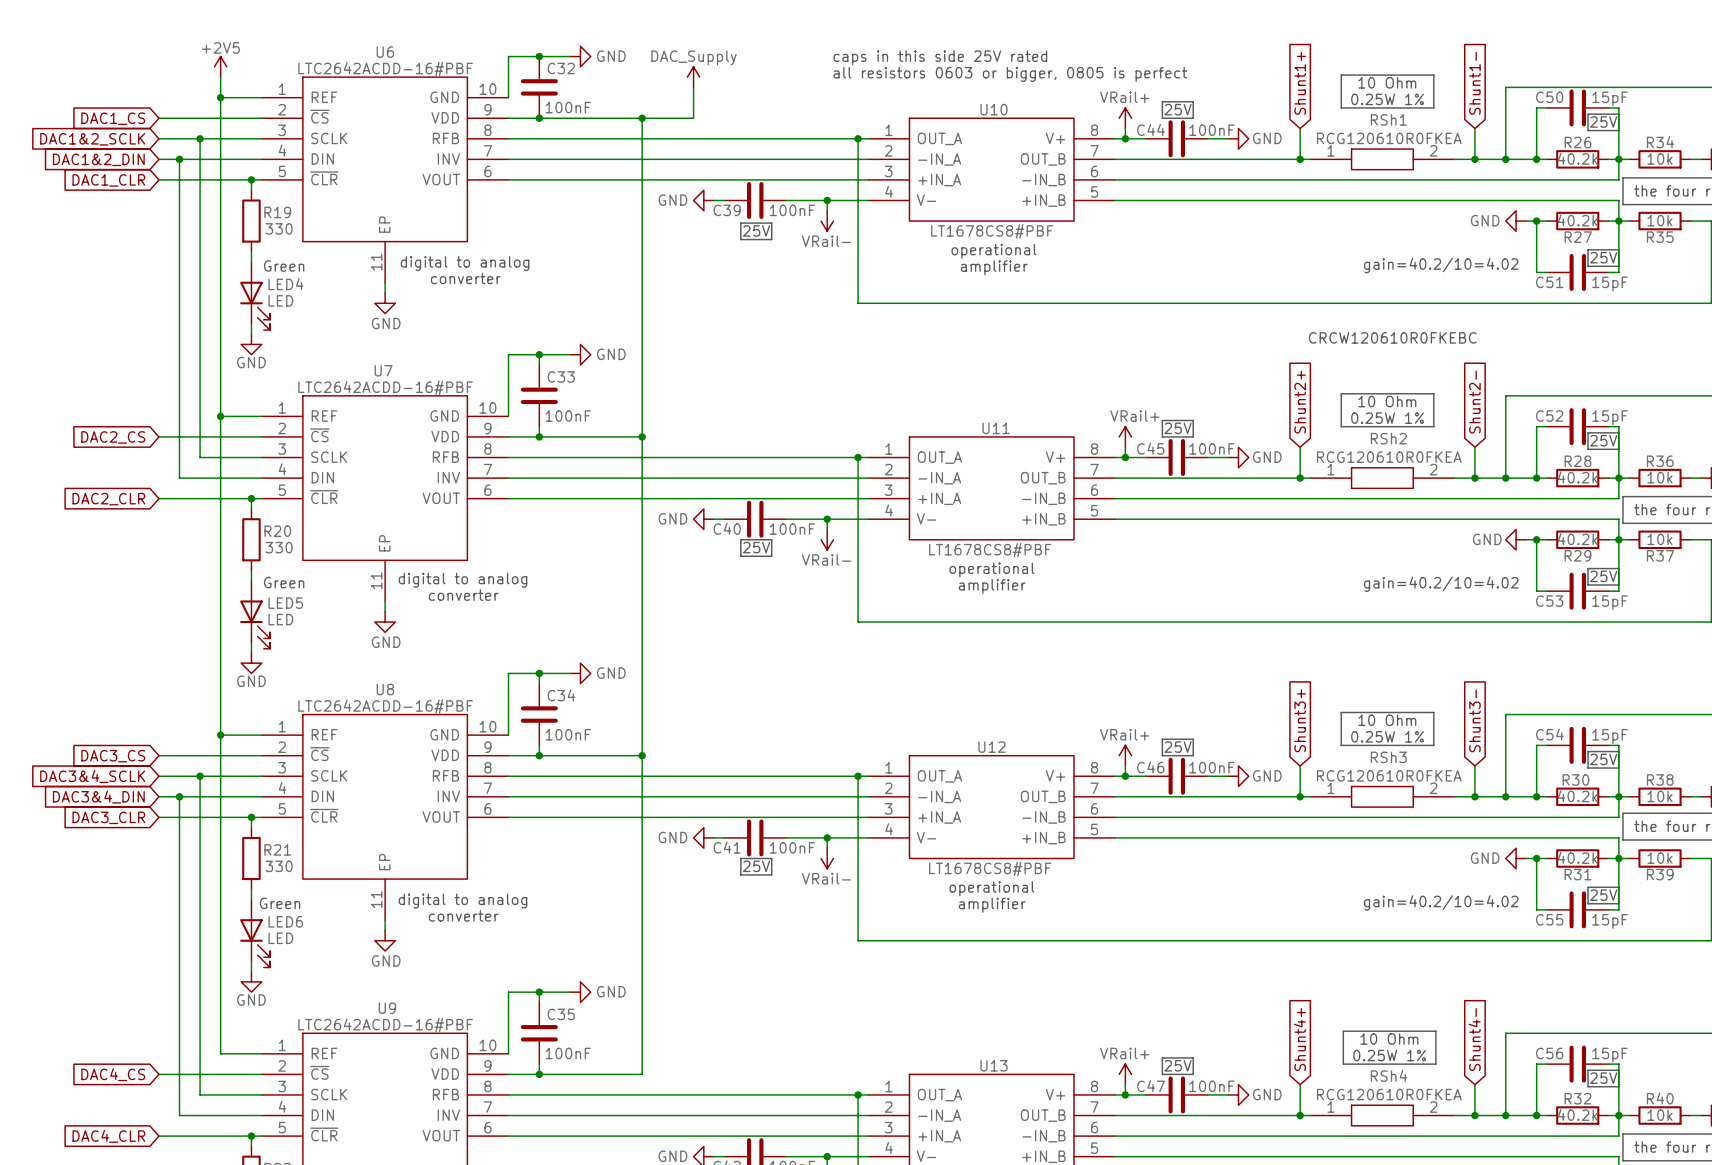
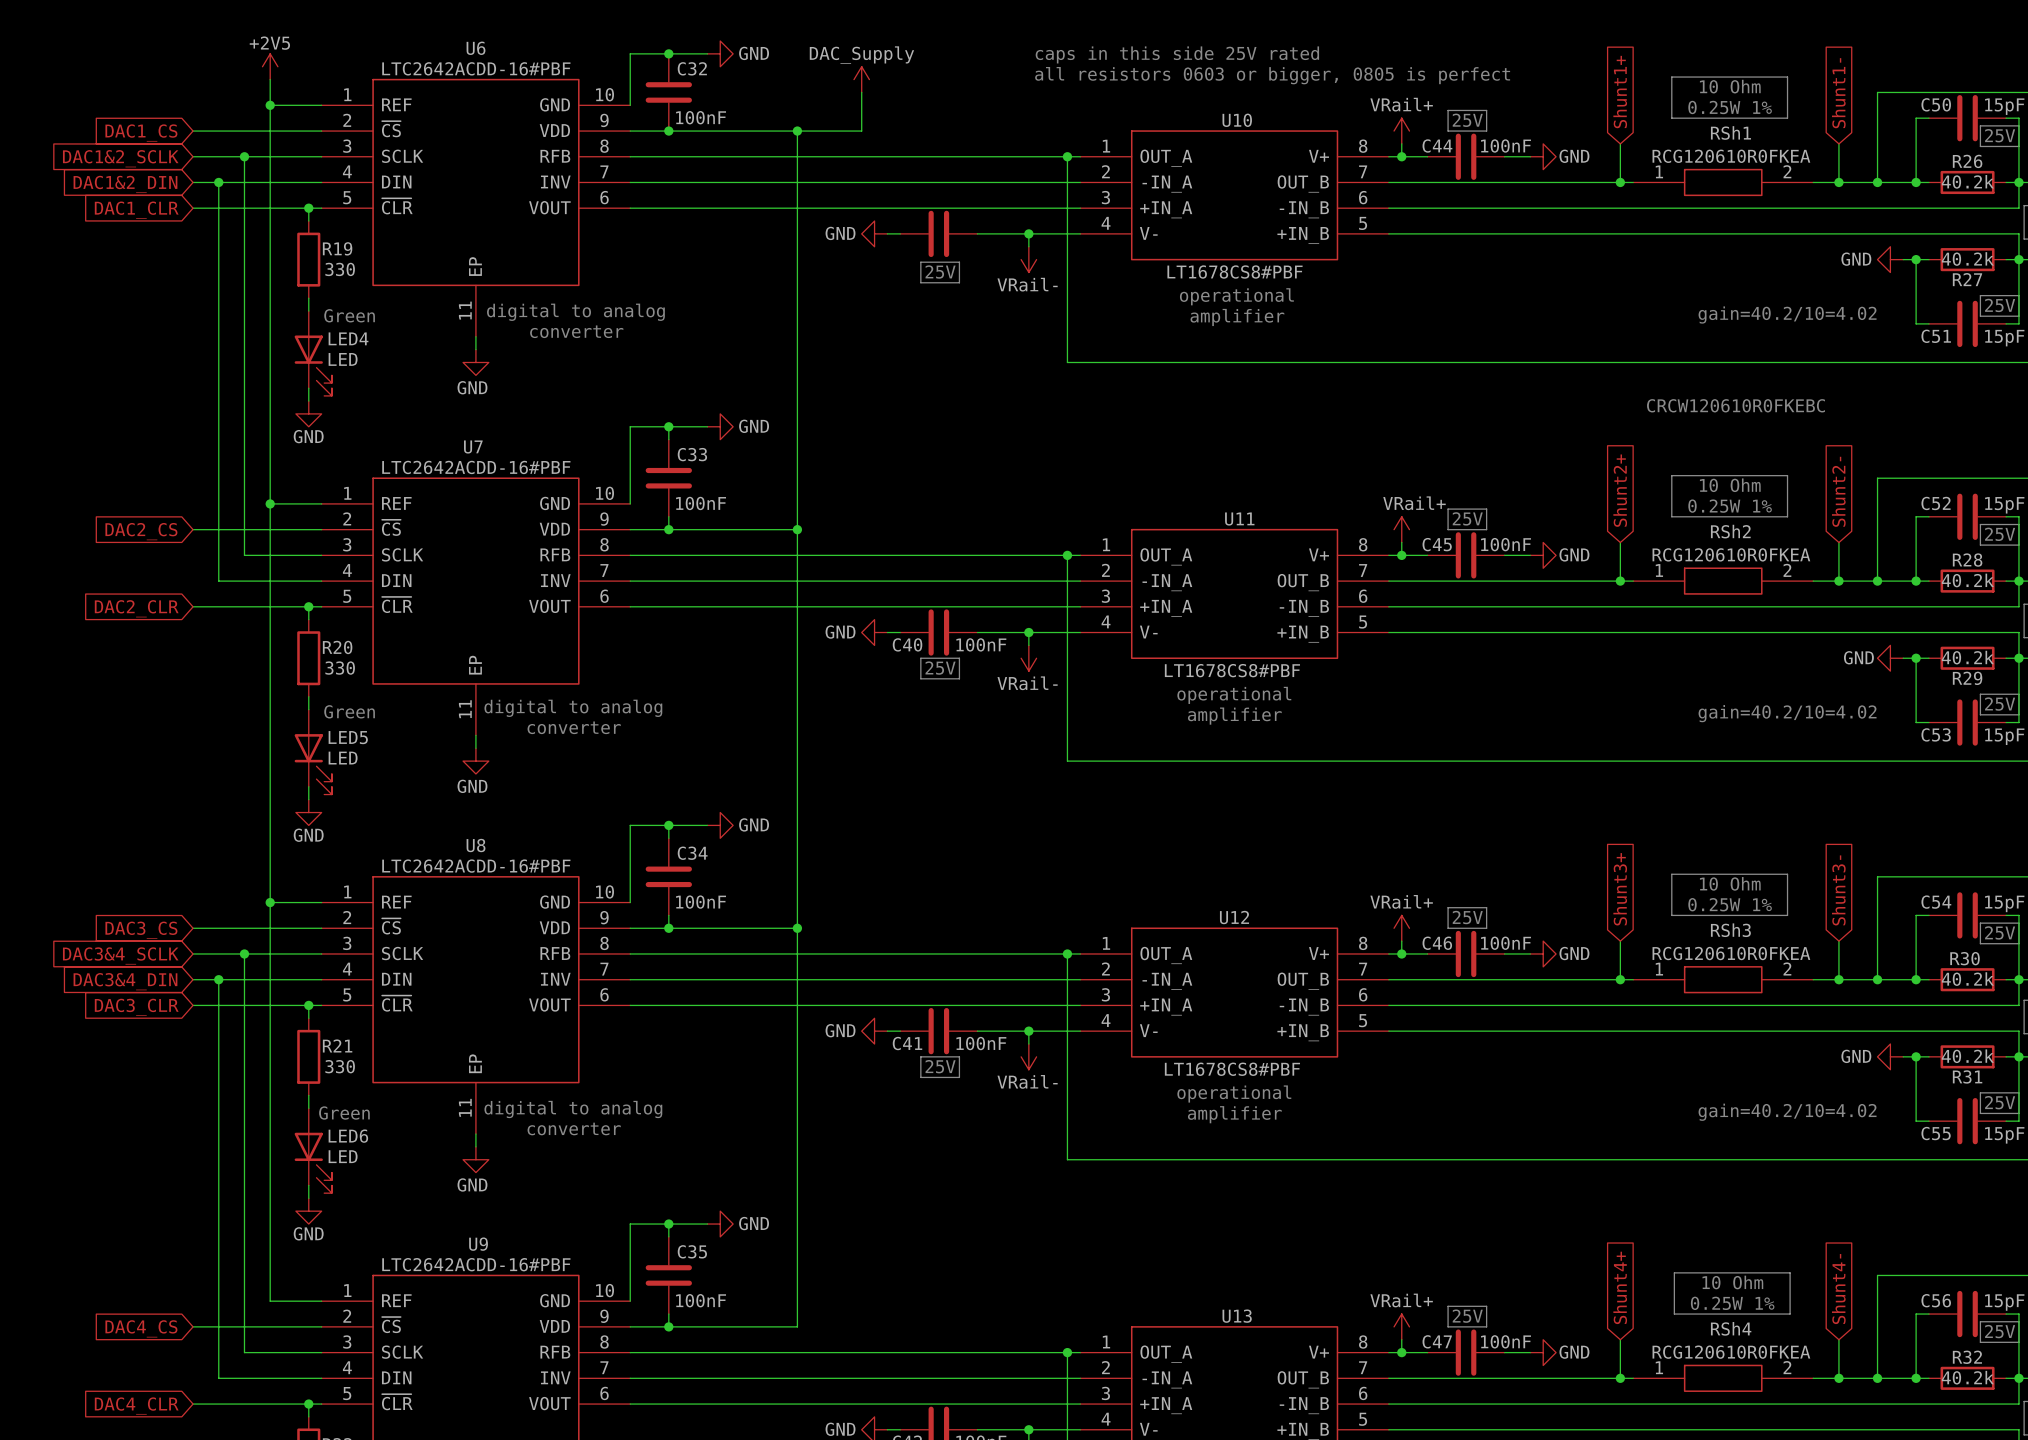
C39 name: C39 (727, 210) -> none
C39 value: 100nF (792, 210) -> none

